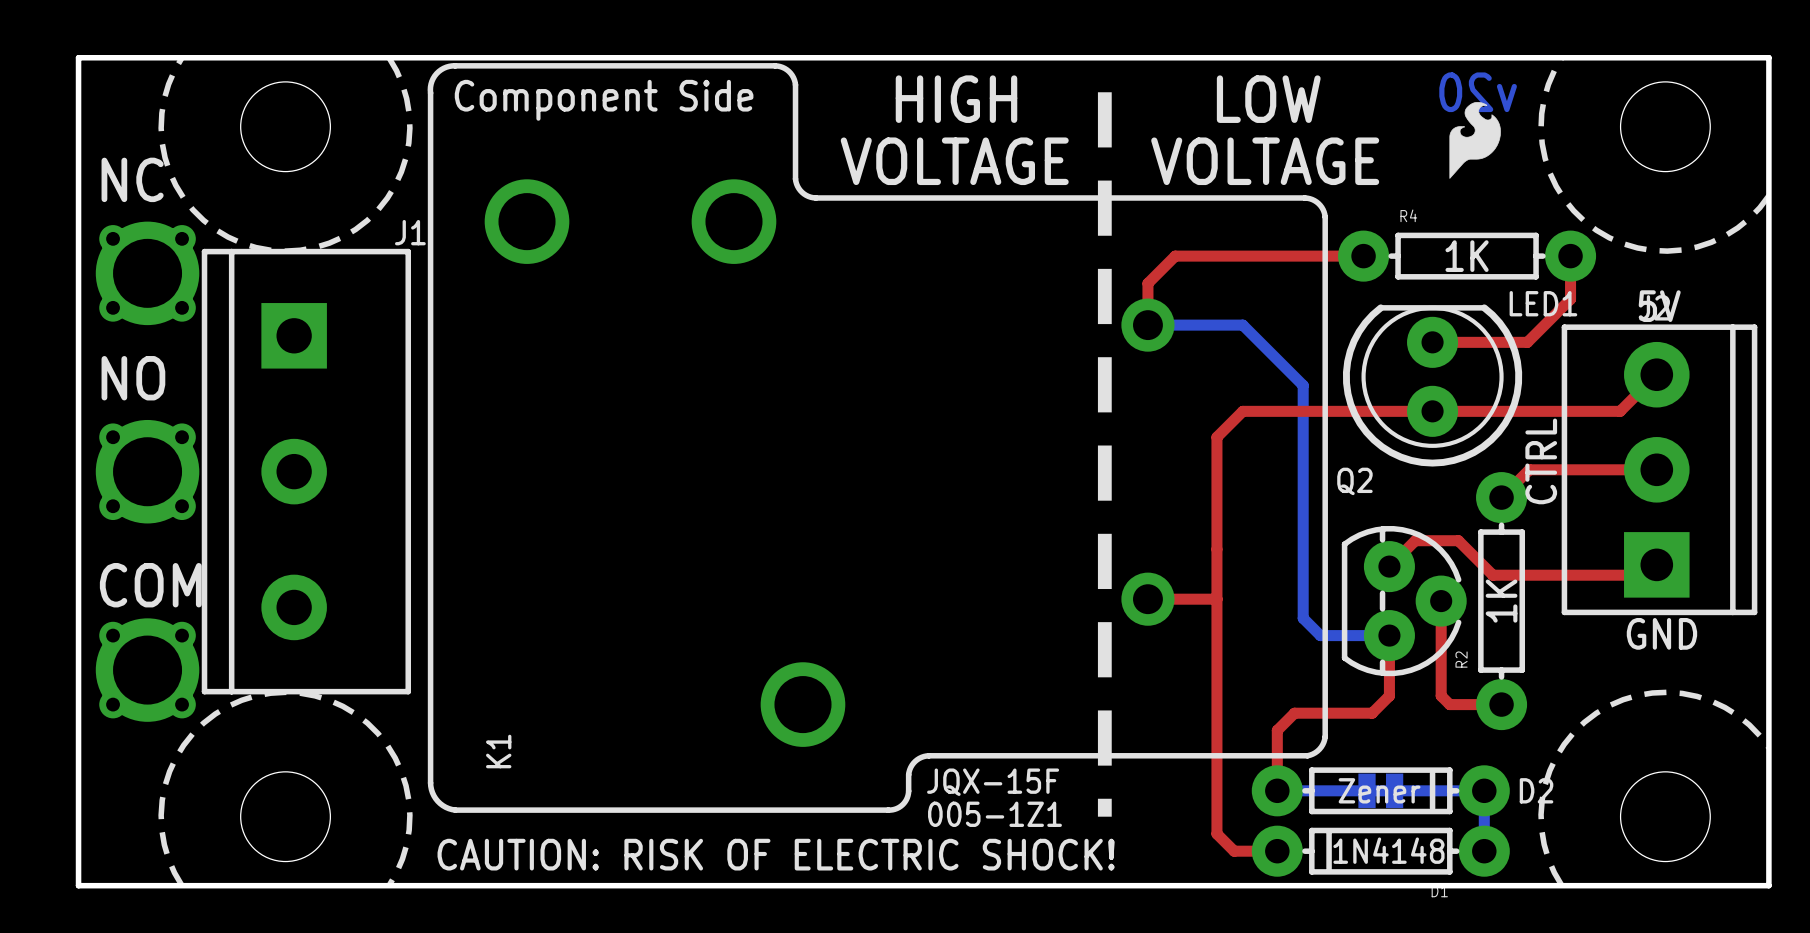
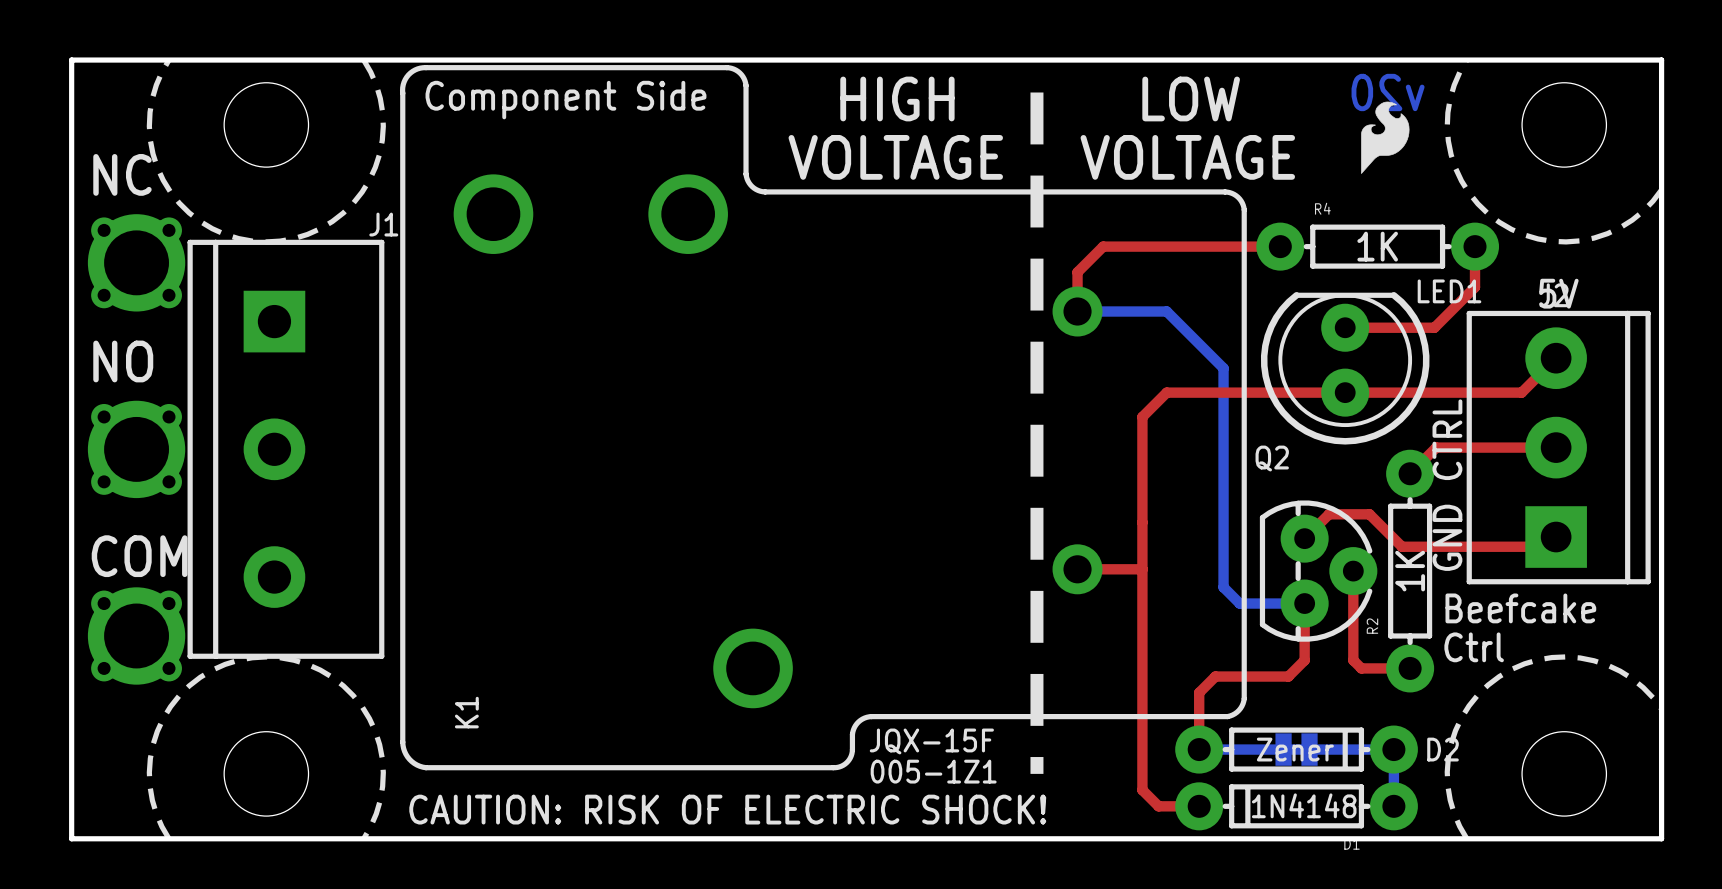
text rotation: 0° (1661, 633) -> 90° counterclockwise (1447, 537)
text position: GND (1661, 633) -> GND (1447, 537)
text: none -> Beefcake (1520, 608)
text: none -> Ctrl (1474, 647)

